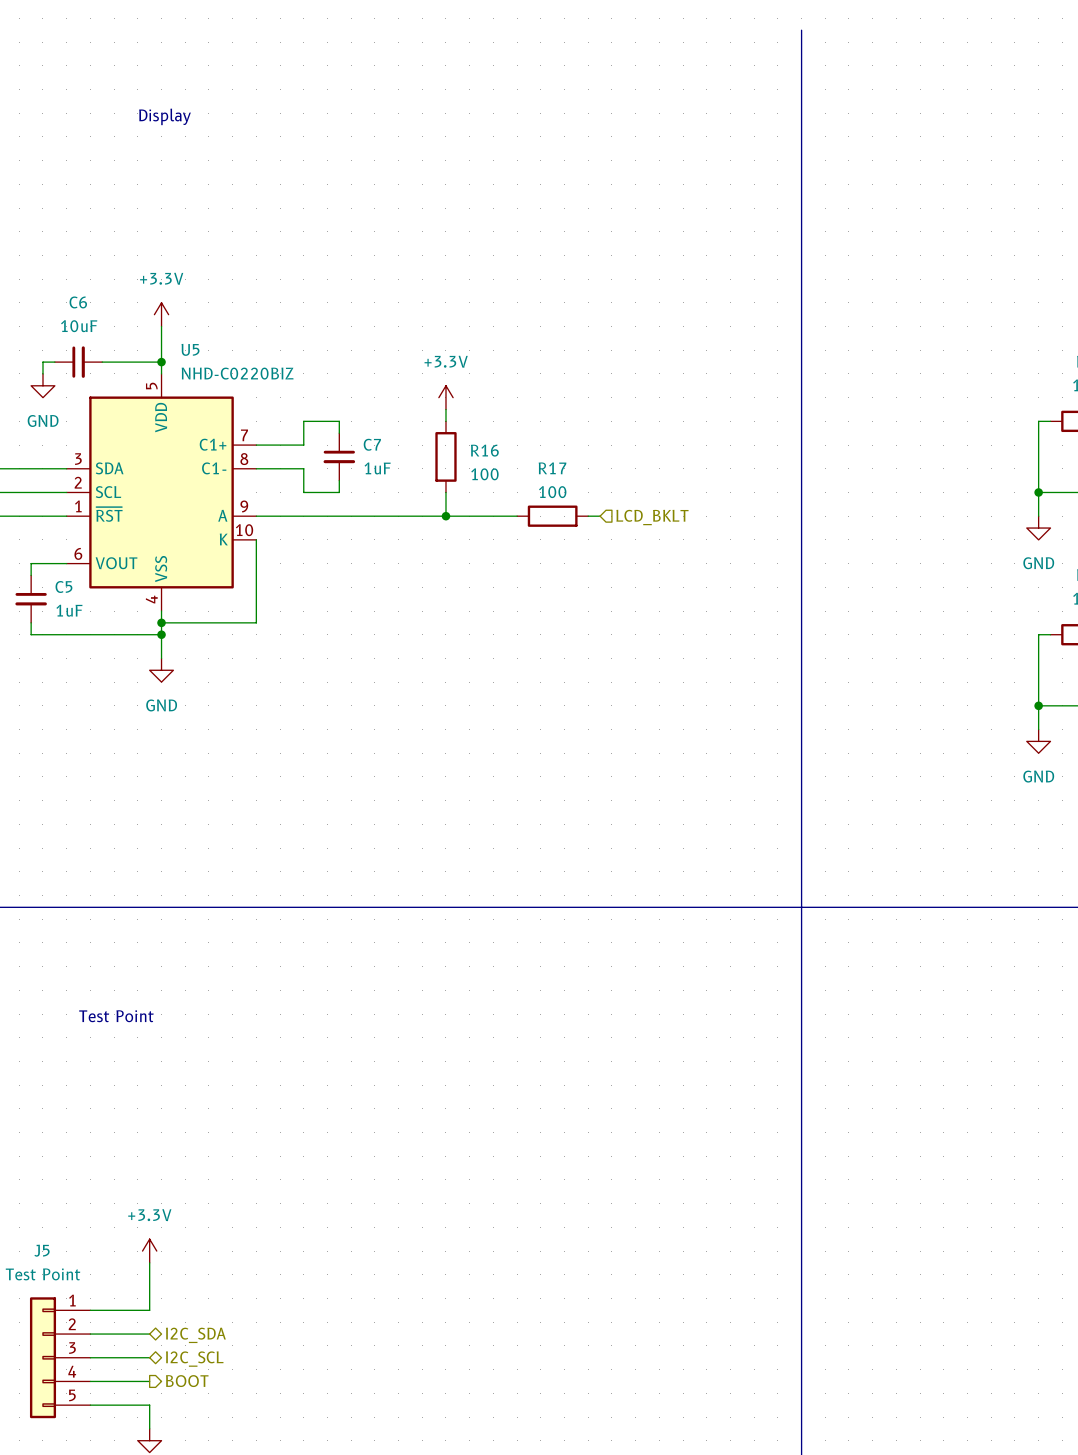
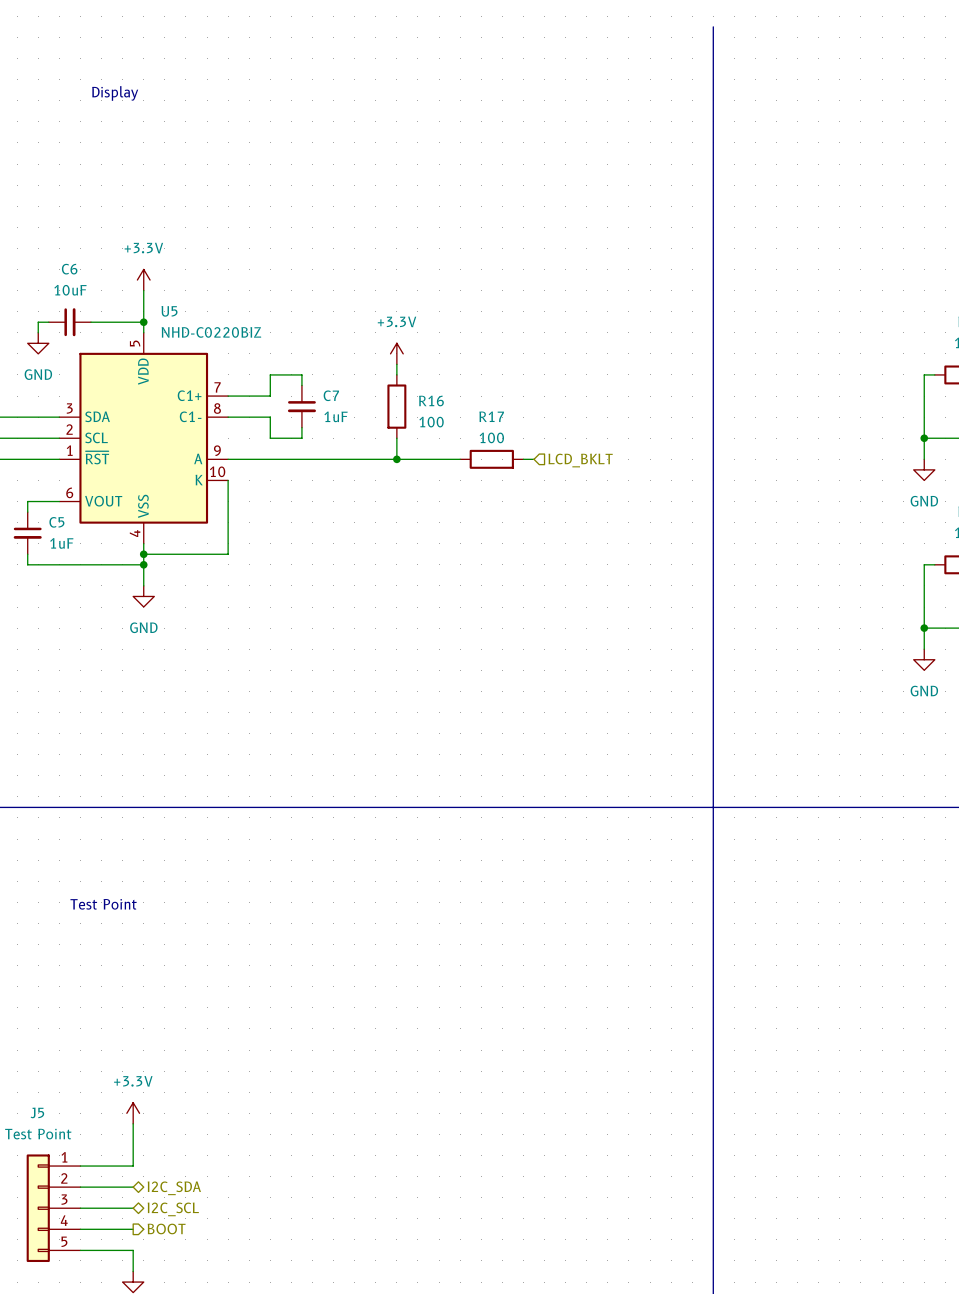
text position: Display (165, 116) -> Display (115, 93)

